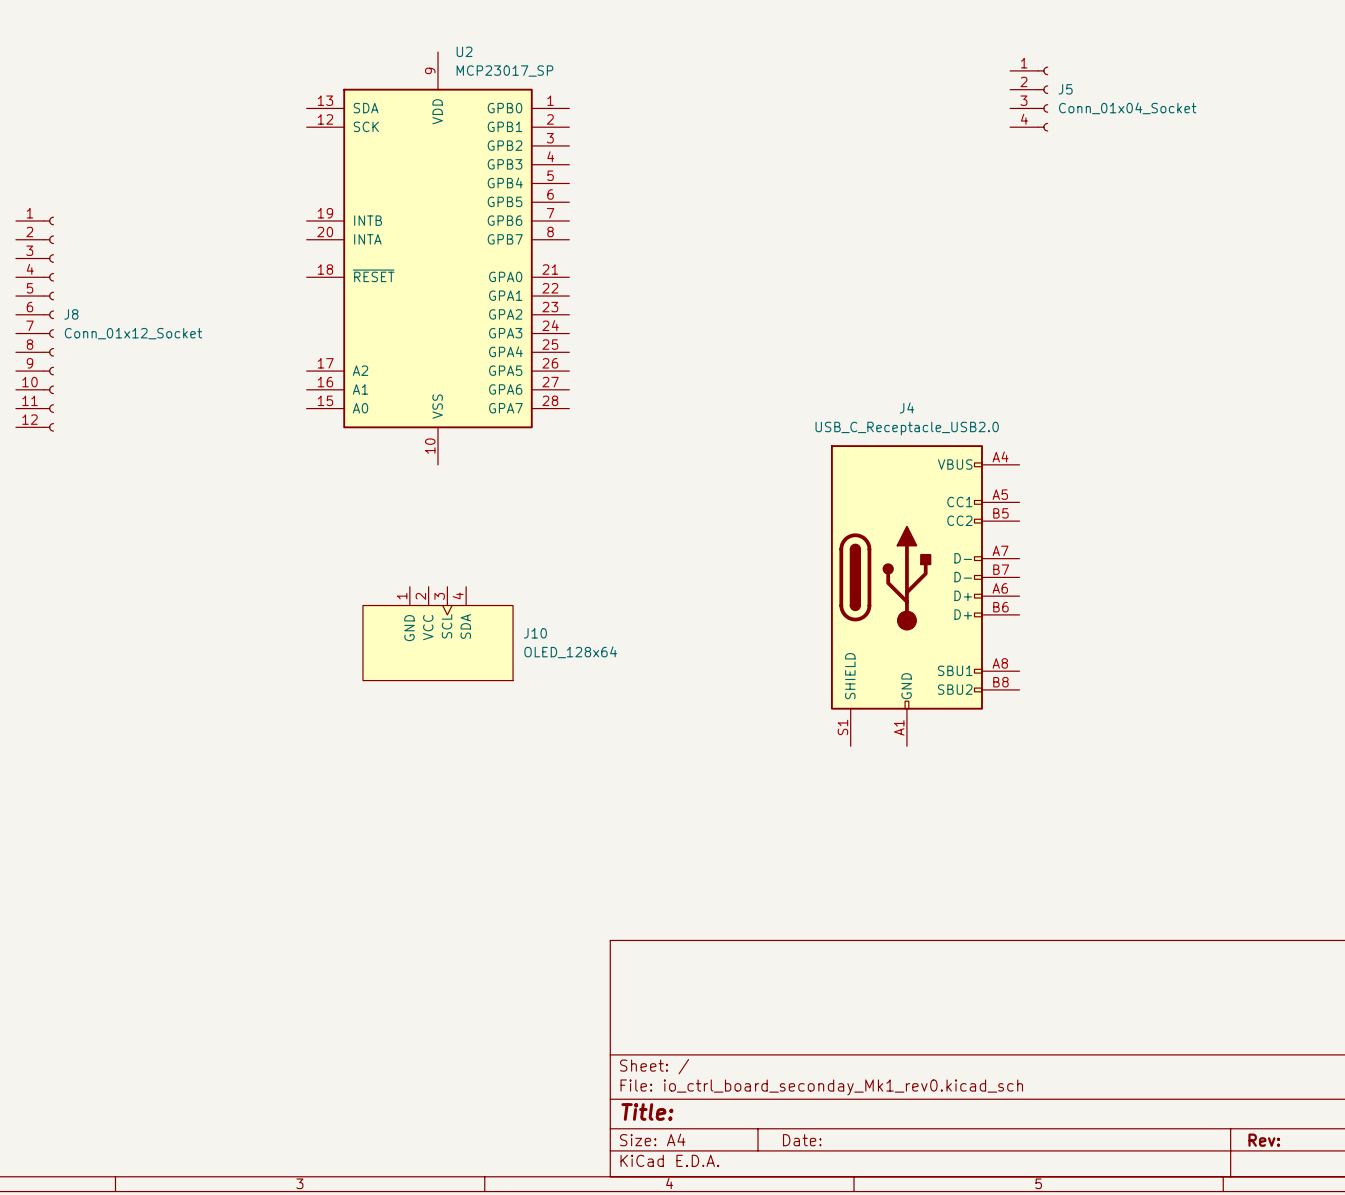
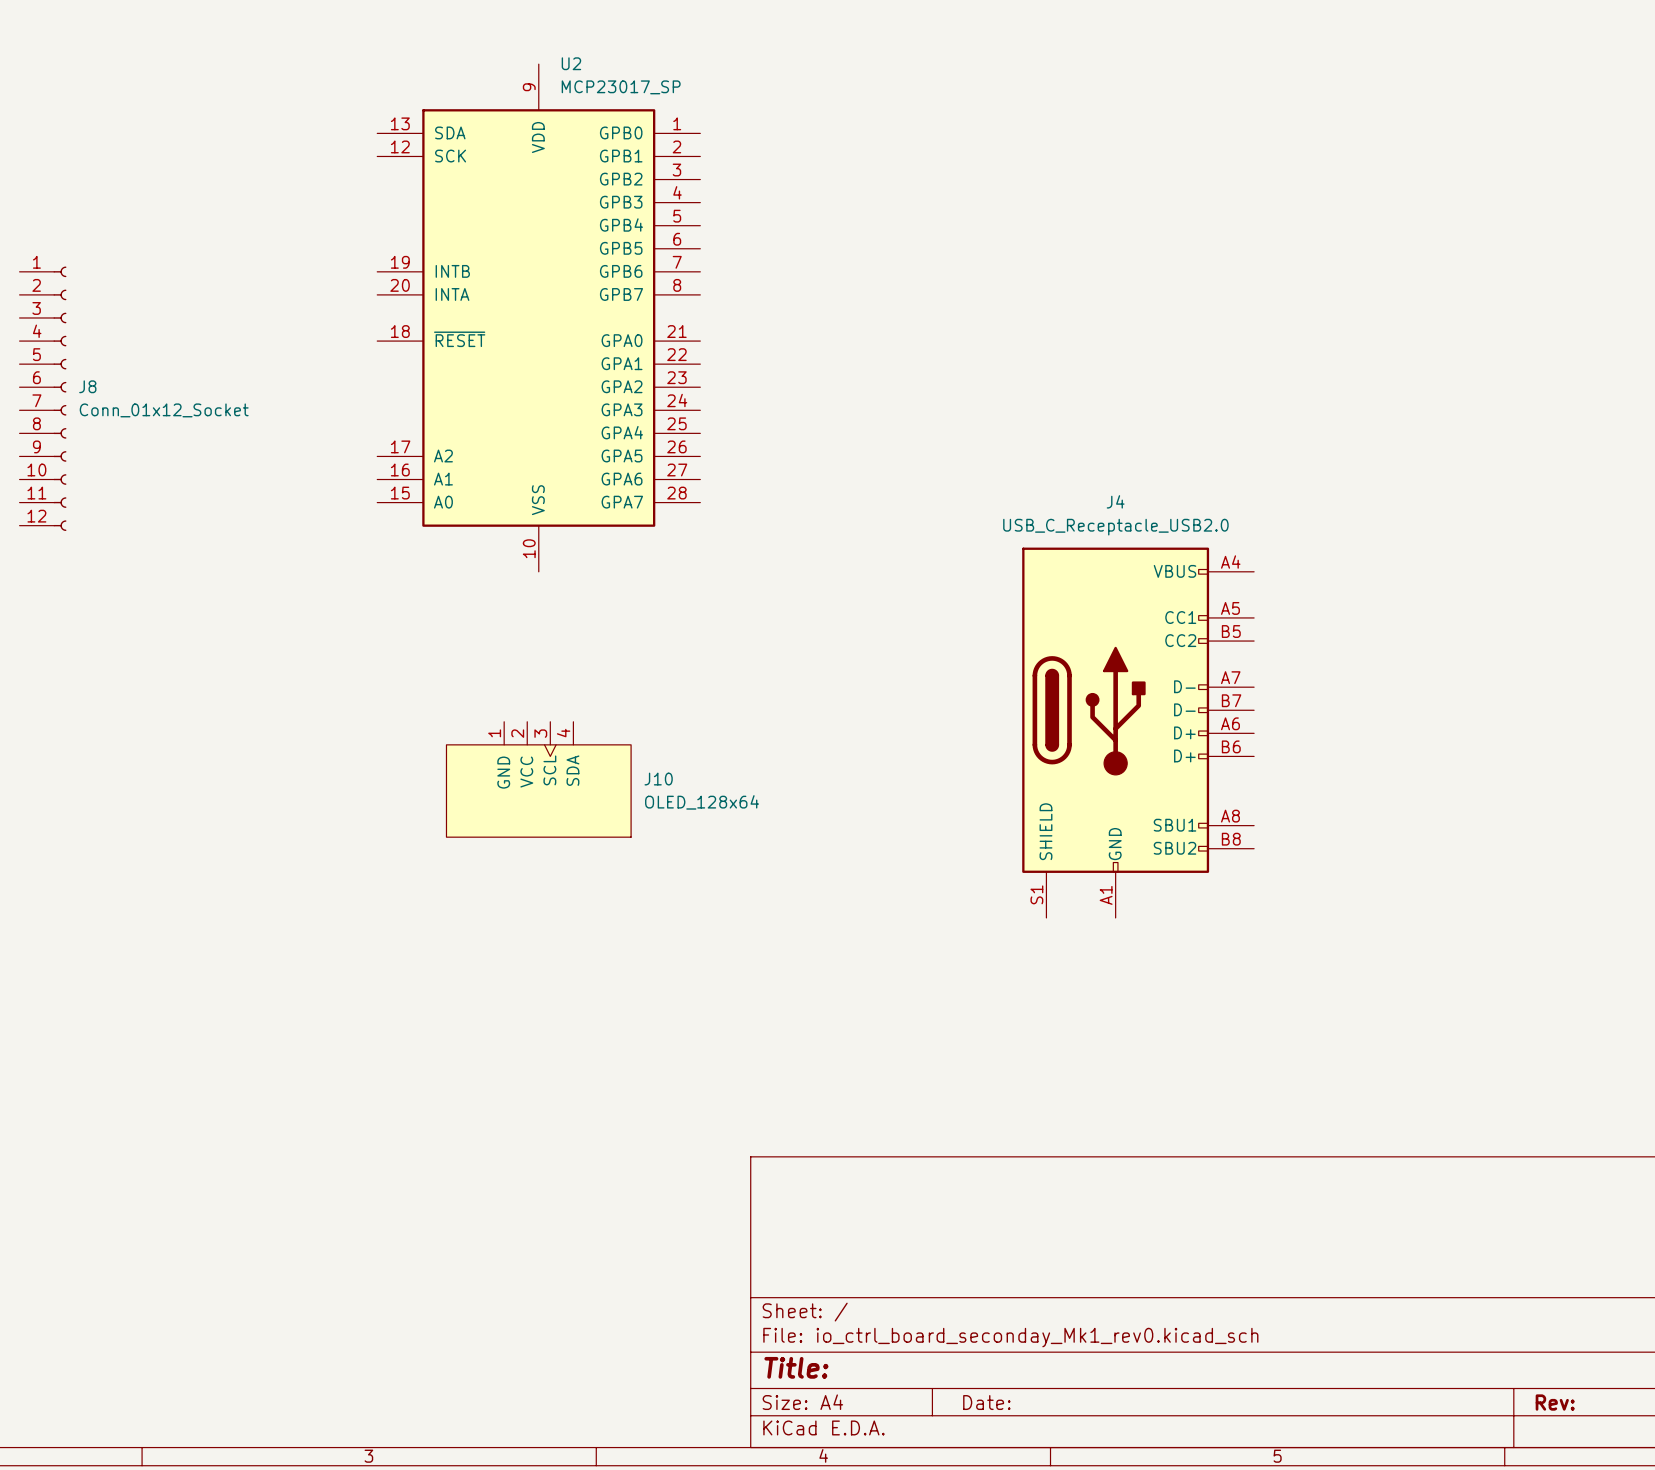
J5: Conn_01x04_Socket (1029, 99) -> none

